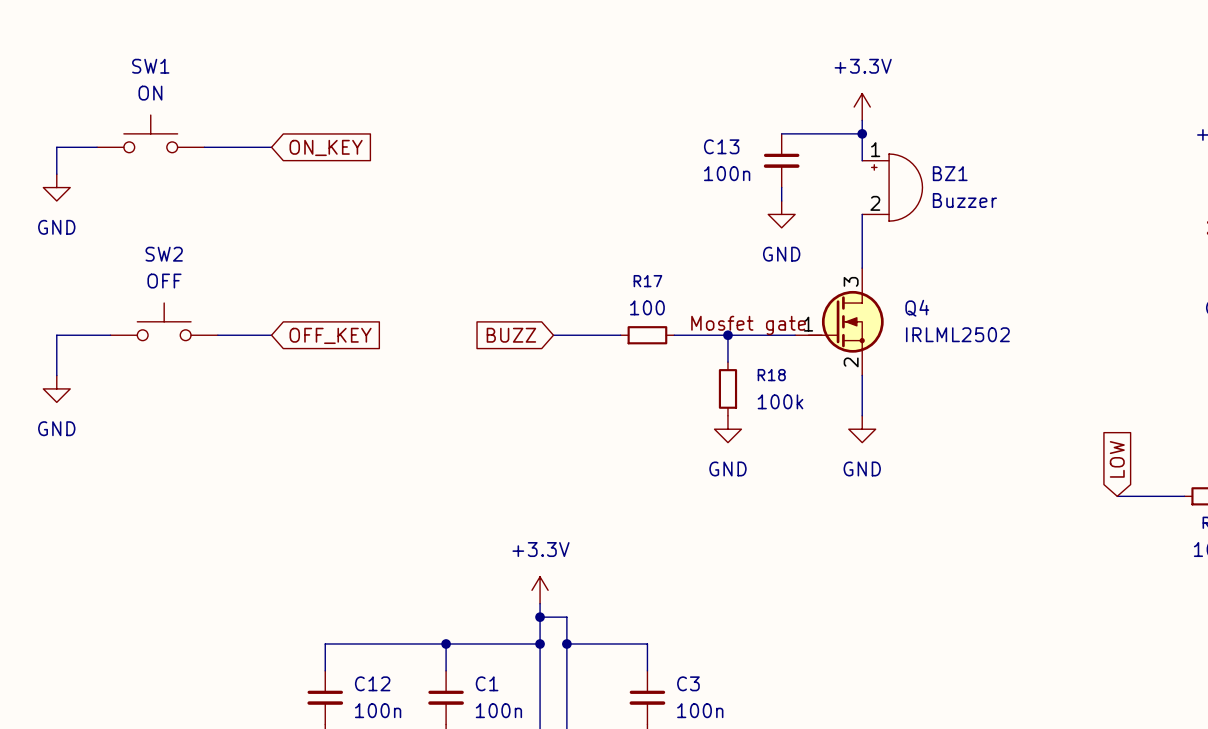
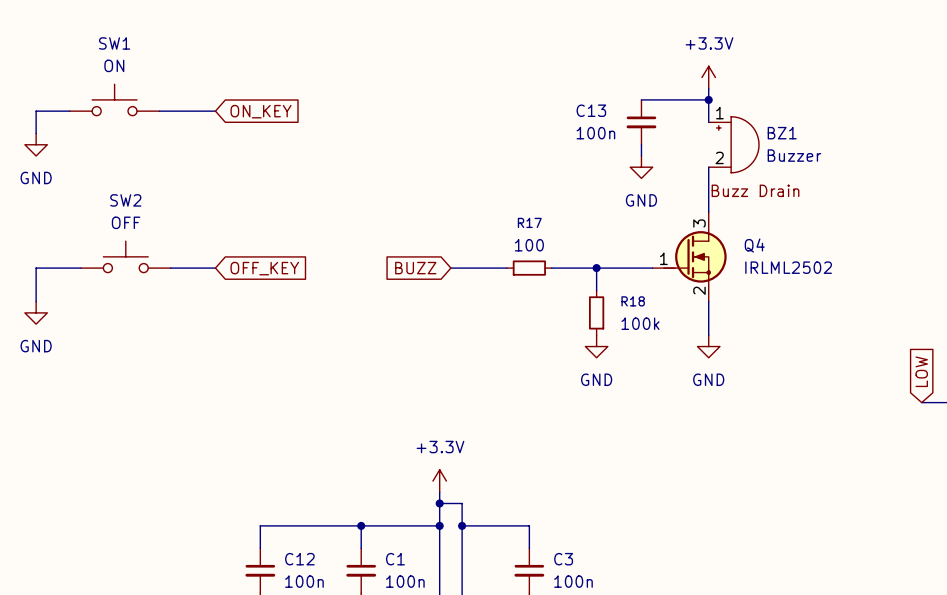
label: none -> Buzz Drain (755, 190)
label: Mosfet gate (748, 325) -> none

